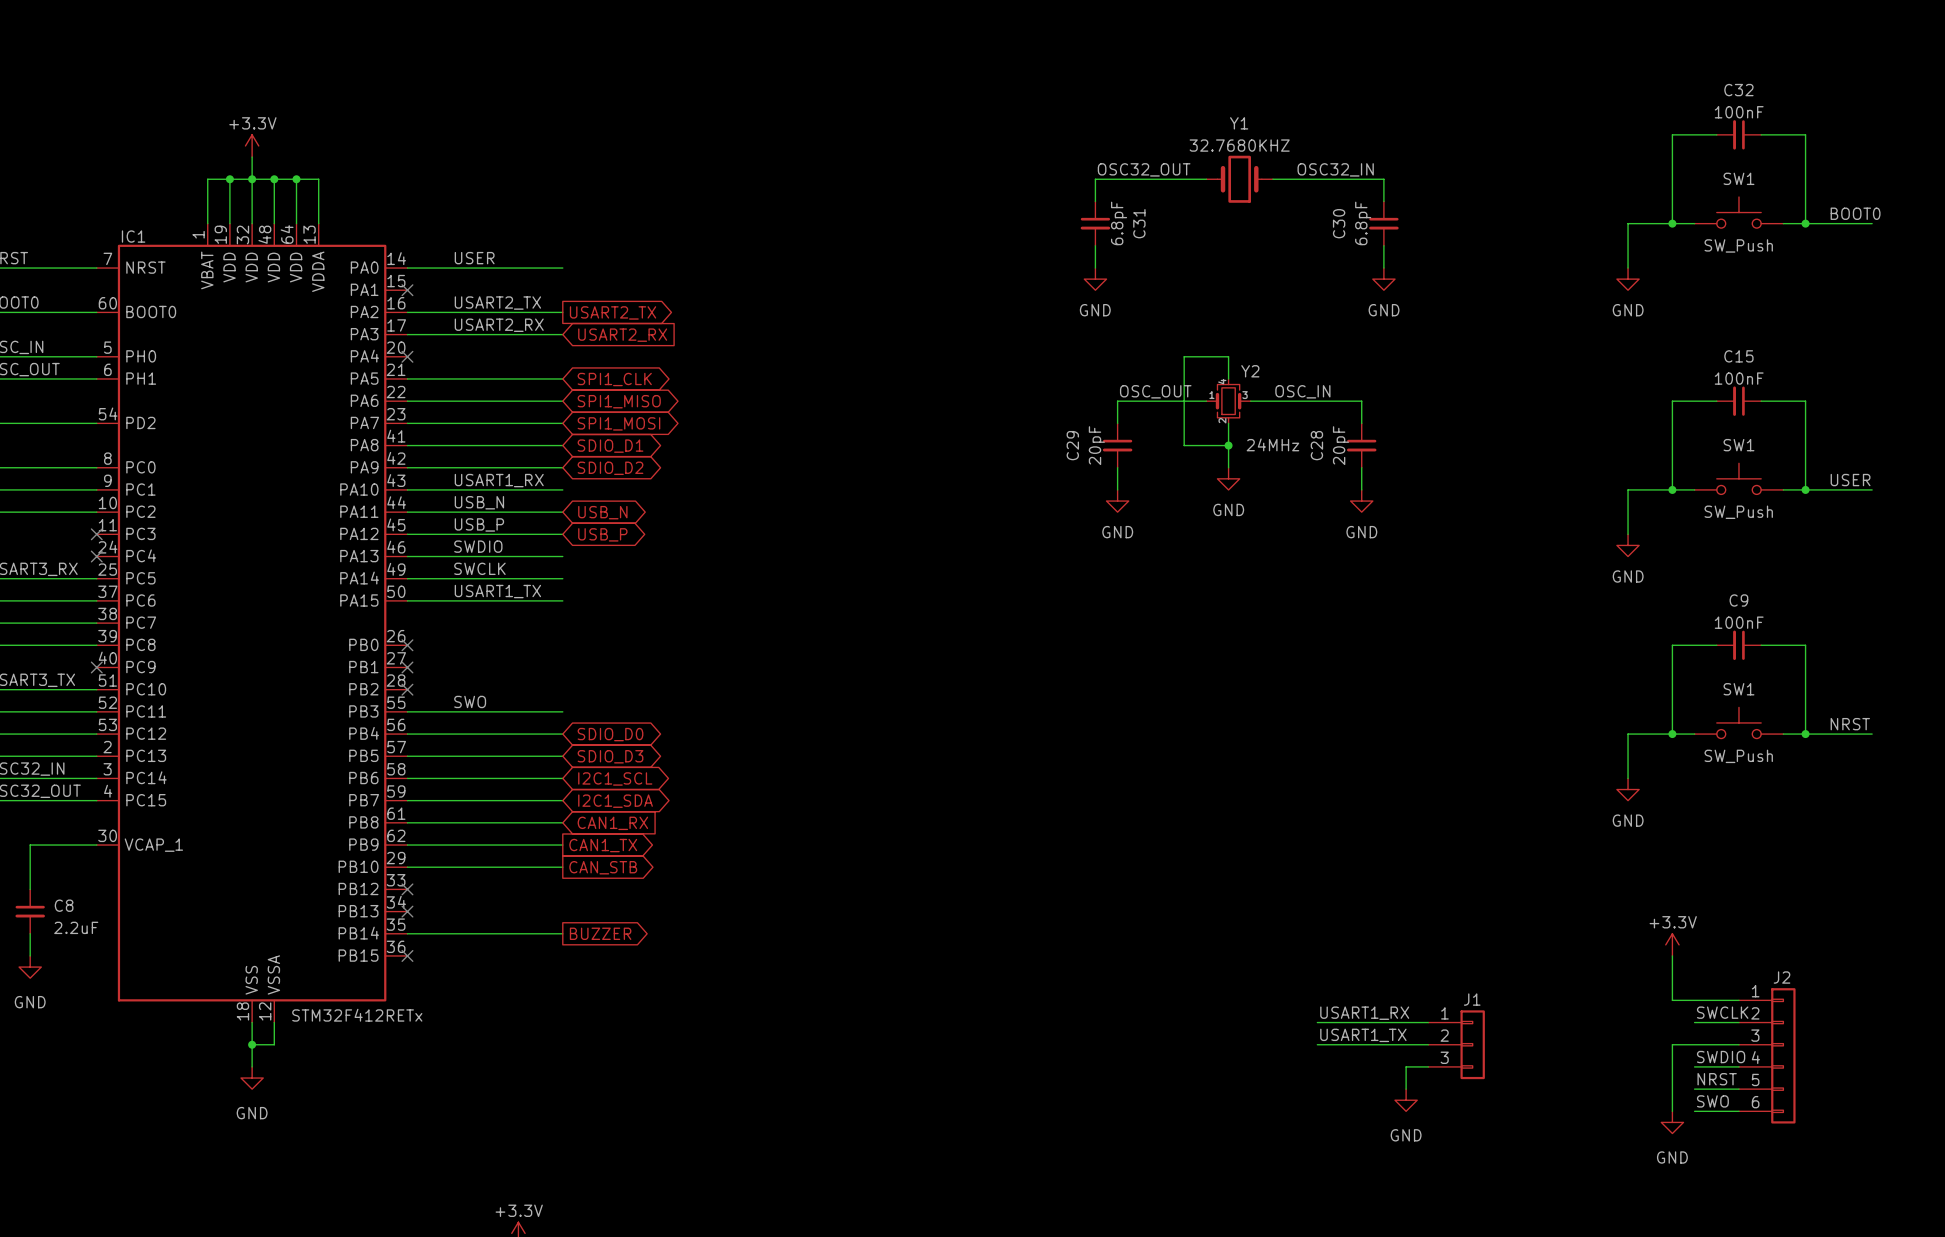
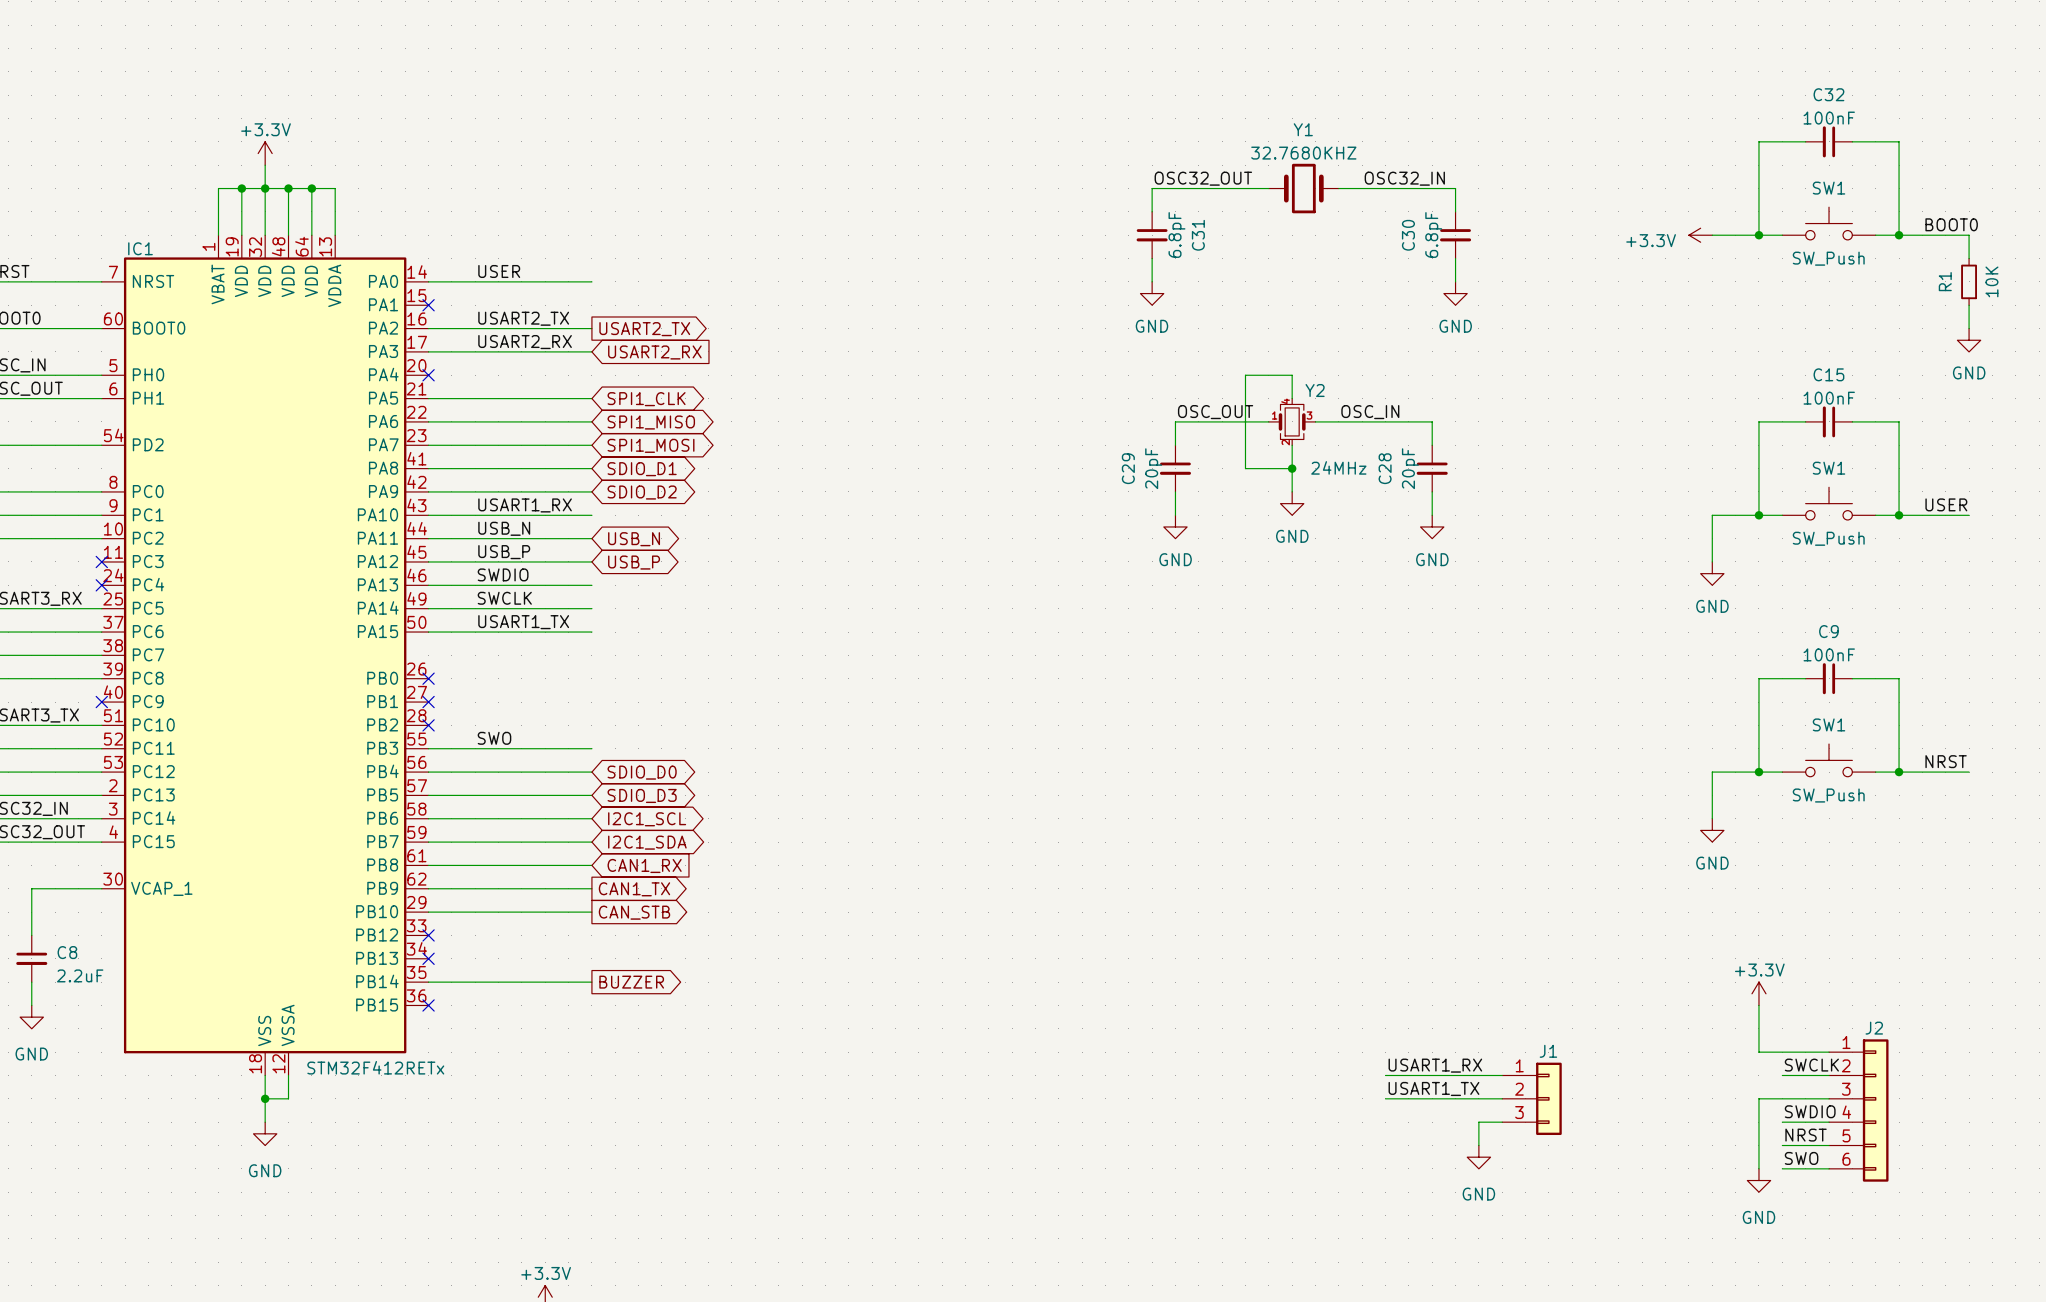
power symbol: none -> +3.3V (1700, 235)
wire: (1628, 223) (1628, 268) -> none
wire: none -> (1969, 235) (1969, 258)
R1: none -> 10K (1969, 281)
power symbol: GND (1628, 279) -> none
wire: none -> (1969, 305) (1969, 328)
power symbol: none -> GND (1969, 340)

